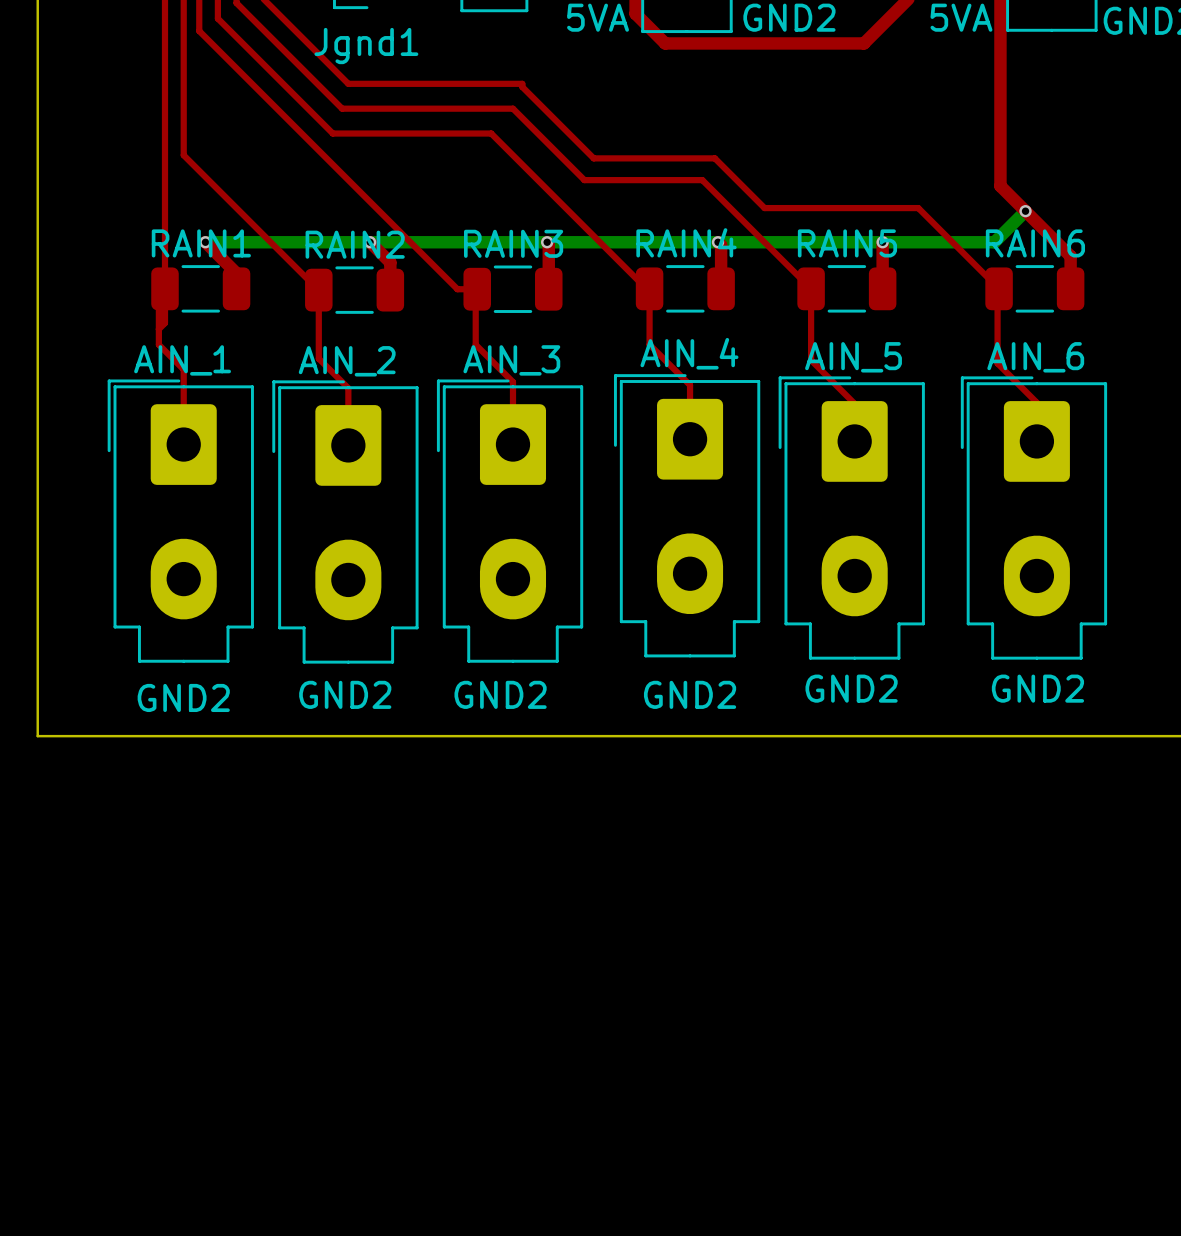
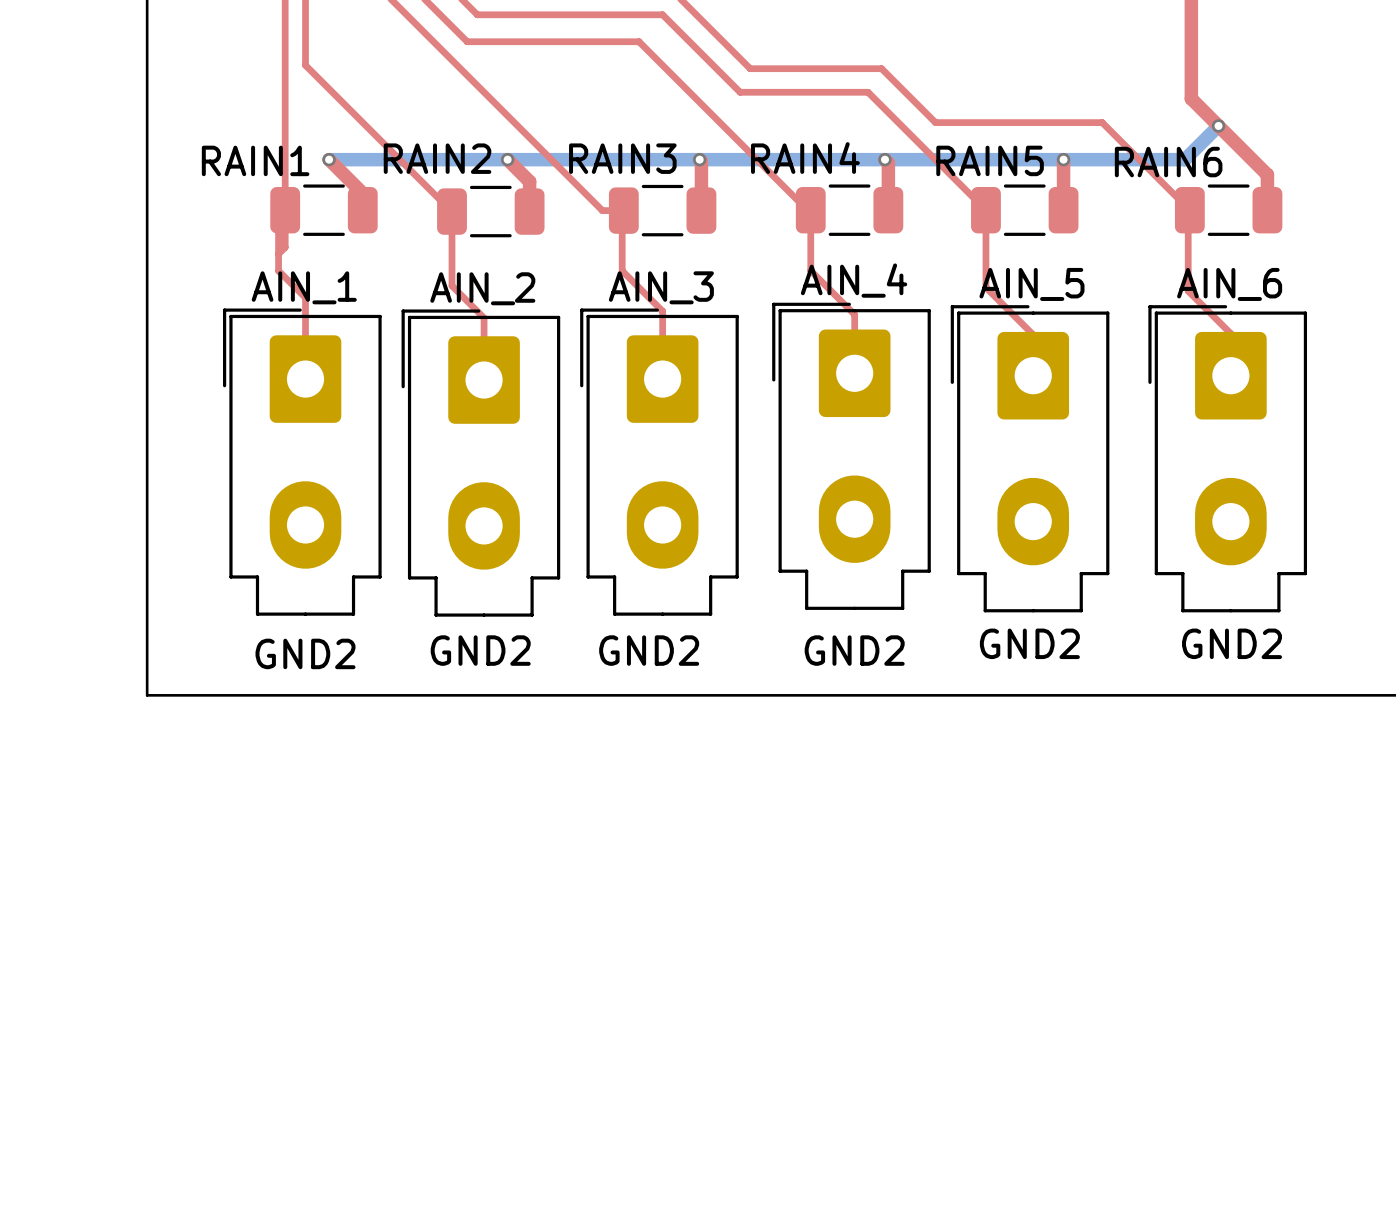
RAIN4 name position: RAIN4 (686, 242) -> RAIN4 (805, 158)
RAIN1 name position: RAIN1 (201, 243) -> RAIN1 (255, 160)
RAIN3 name position: RAIN3 (513, 243) -> RAIN3 (622, 158)
RAIN5 name position: RAIN5 (847, 243) -> RAIN5 (990, 160)
RAIN6 name position: RAIN6 (1035, 243) -> RAIN6 (1168, 162)
RAIN2 name position: RAIN2 (355, 244) -> RAIN2 (437, 158)

